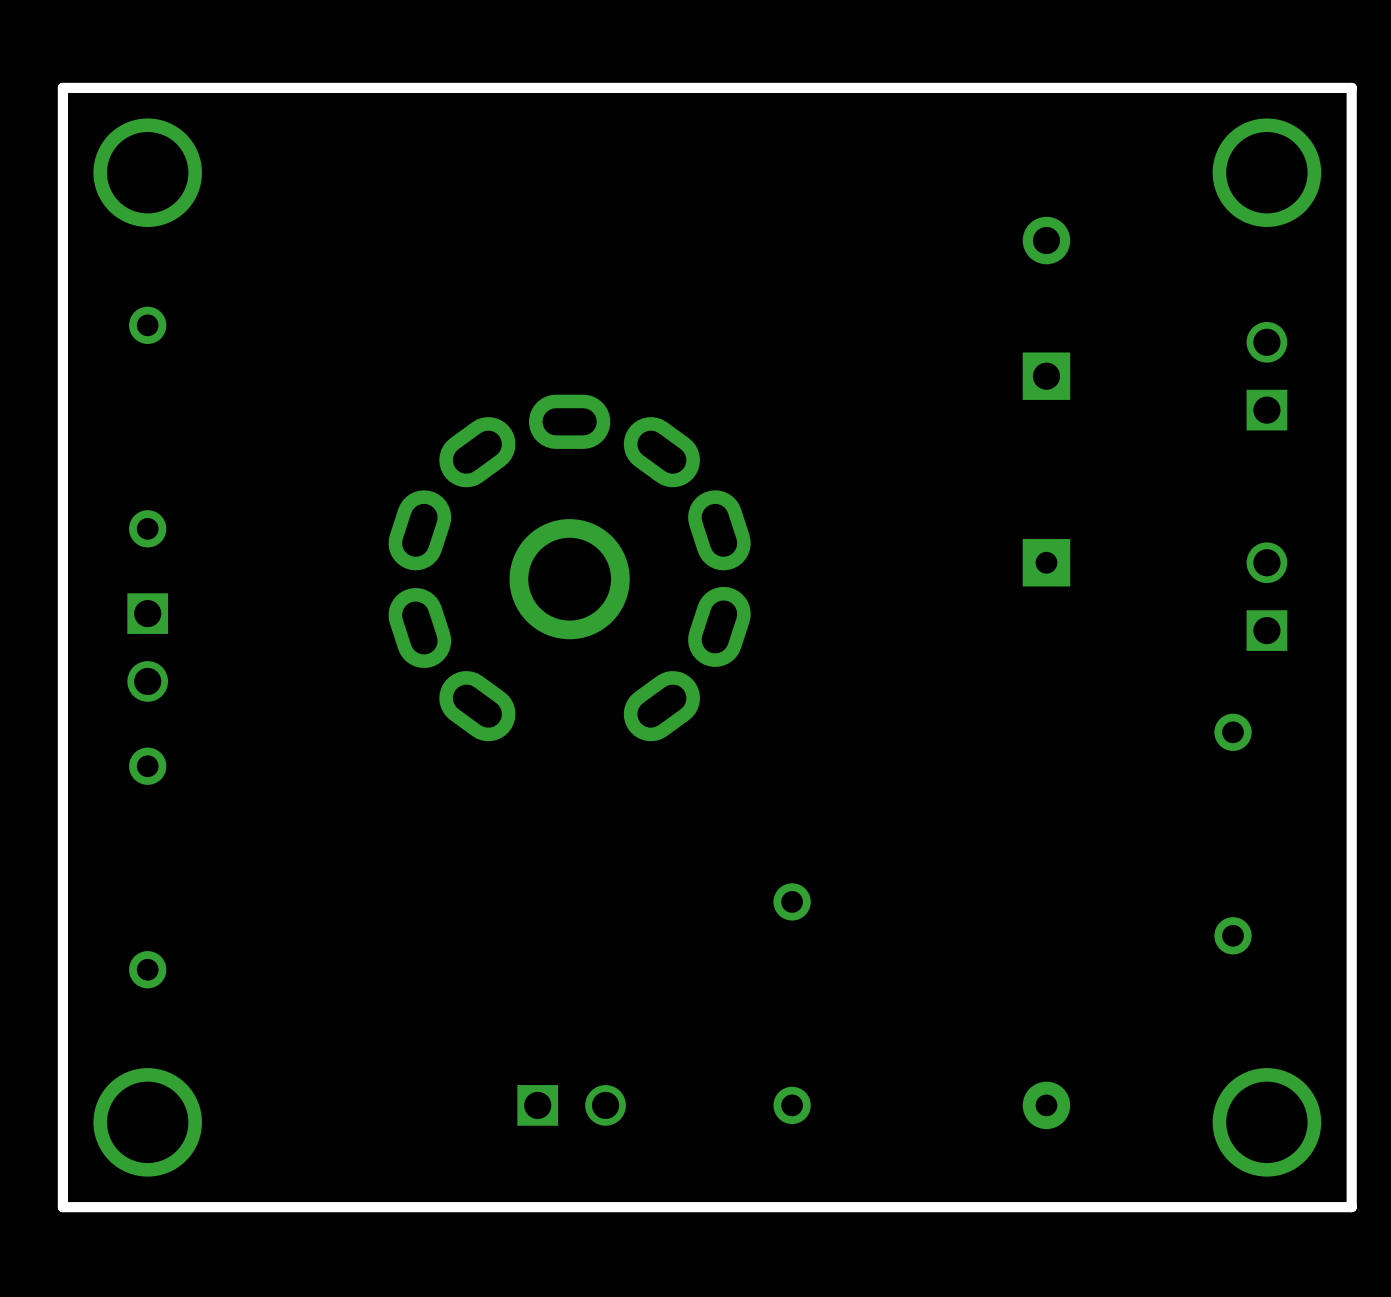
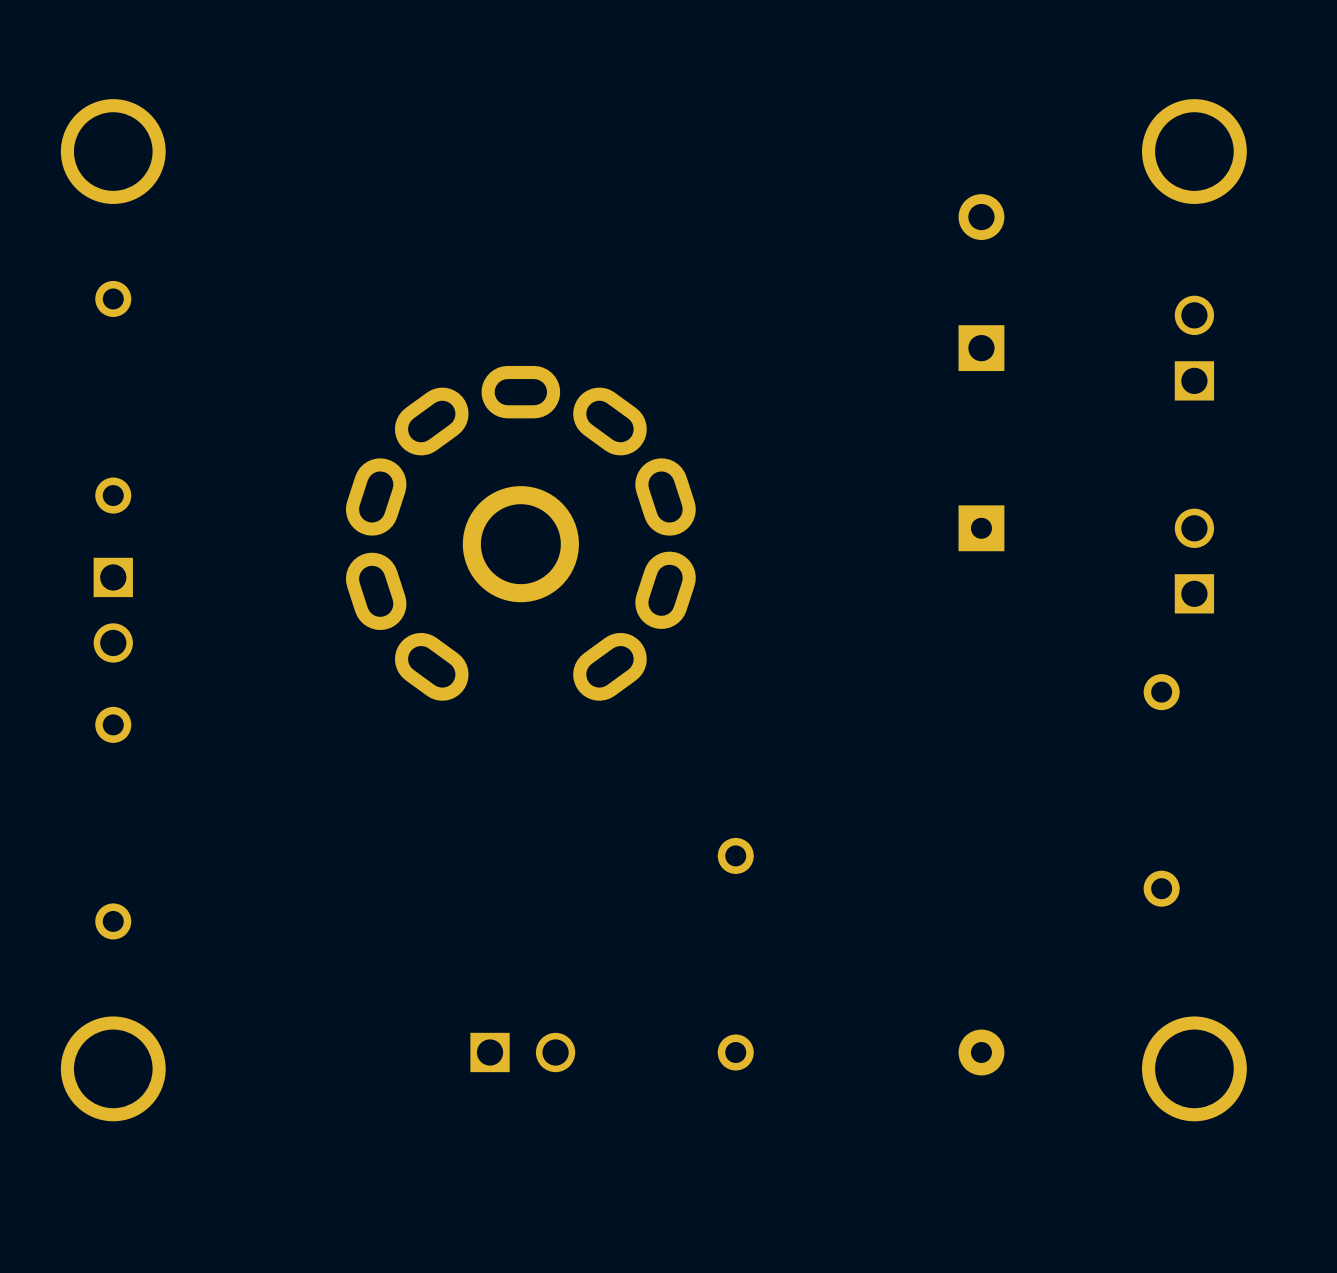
board edge: (1351, 87) (62, 87) (62, 1207) (1351, 1207) (1351, 87) -> none

